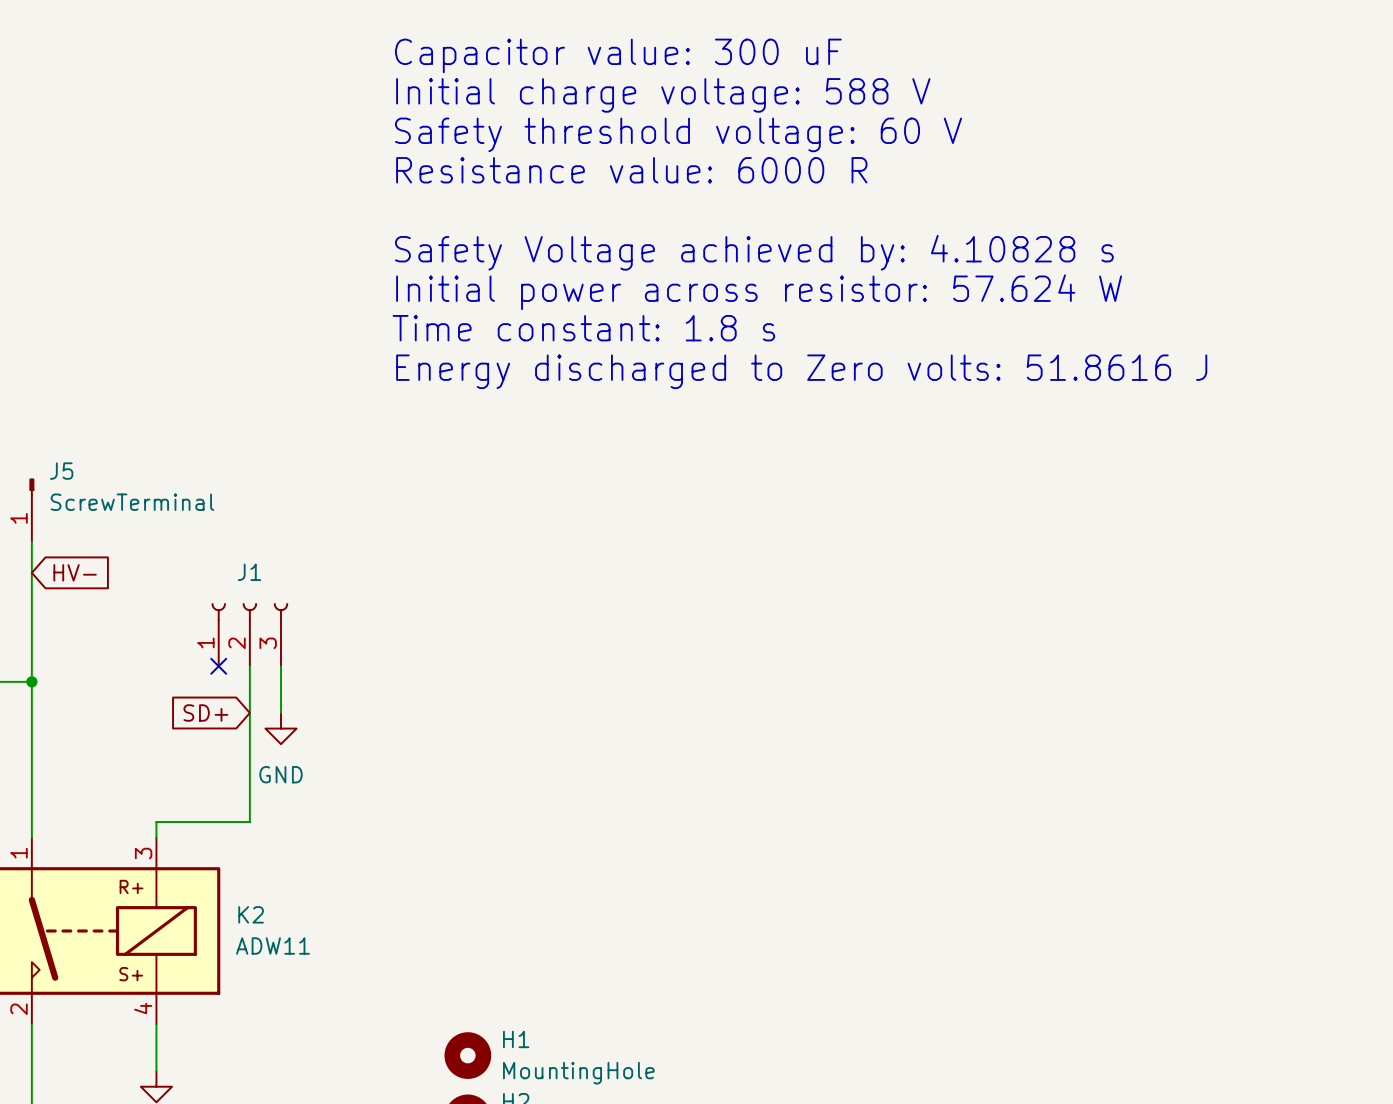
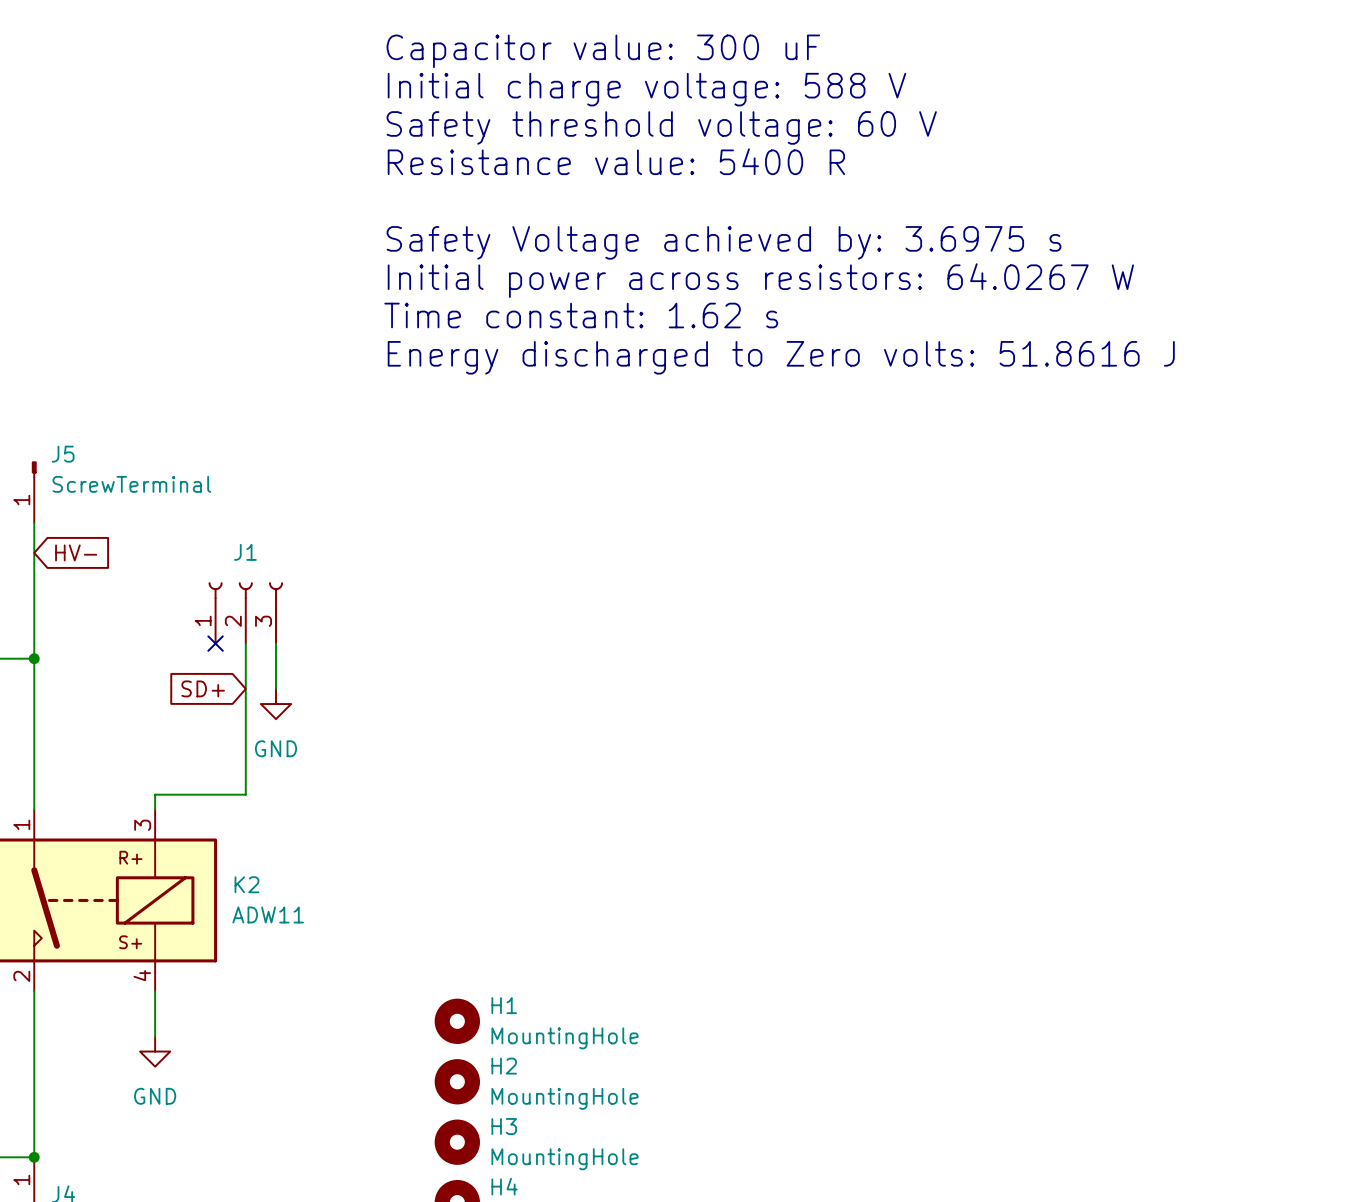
text: Resistance value: 6000 R (631, 170) -> Resistance value: 5400 R (616, 161)
text: Safety Voltage achieved by: 4.10828 s (754, 252) -> Safety Voltage achieved by: 3.6975 s (724, 242)
text: Initial power across resistor: 57.624 W (759, 292) -> Initial power across resistors: 64.0267 W (760, 280)
text: Time constant: 1.8 s (583, 328) -> Time constant: 1.62 s (581, 315)

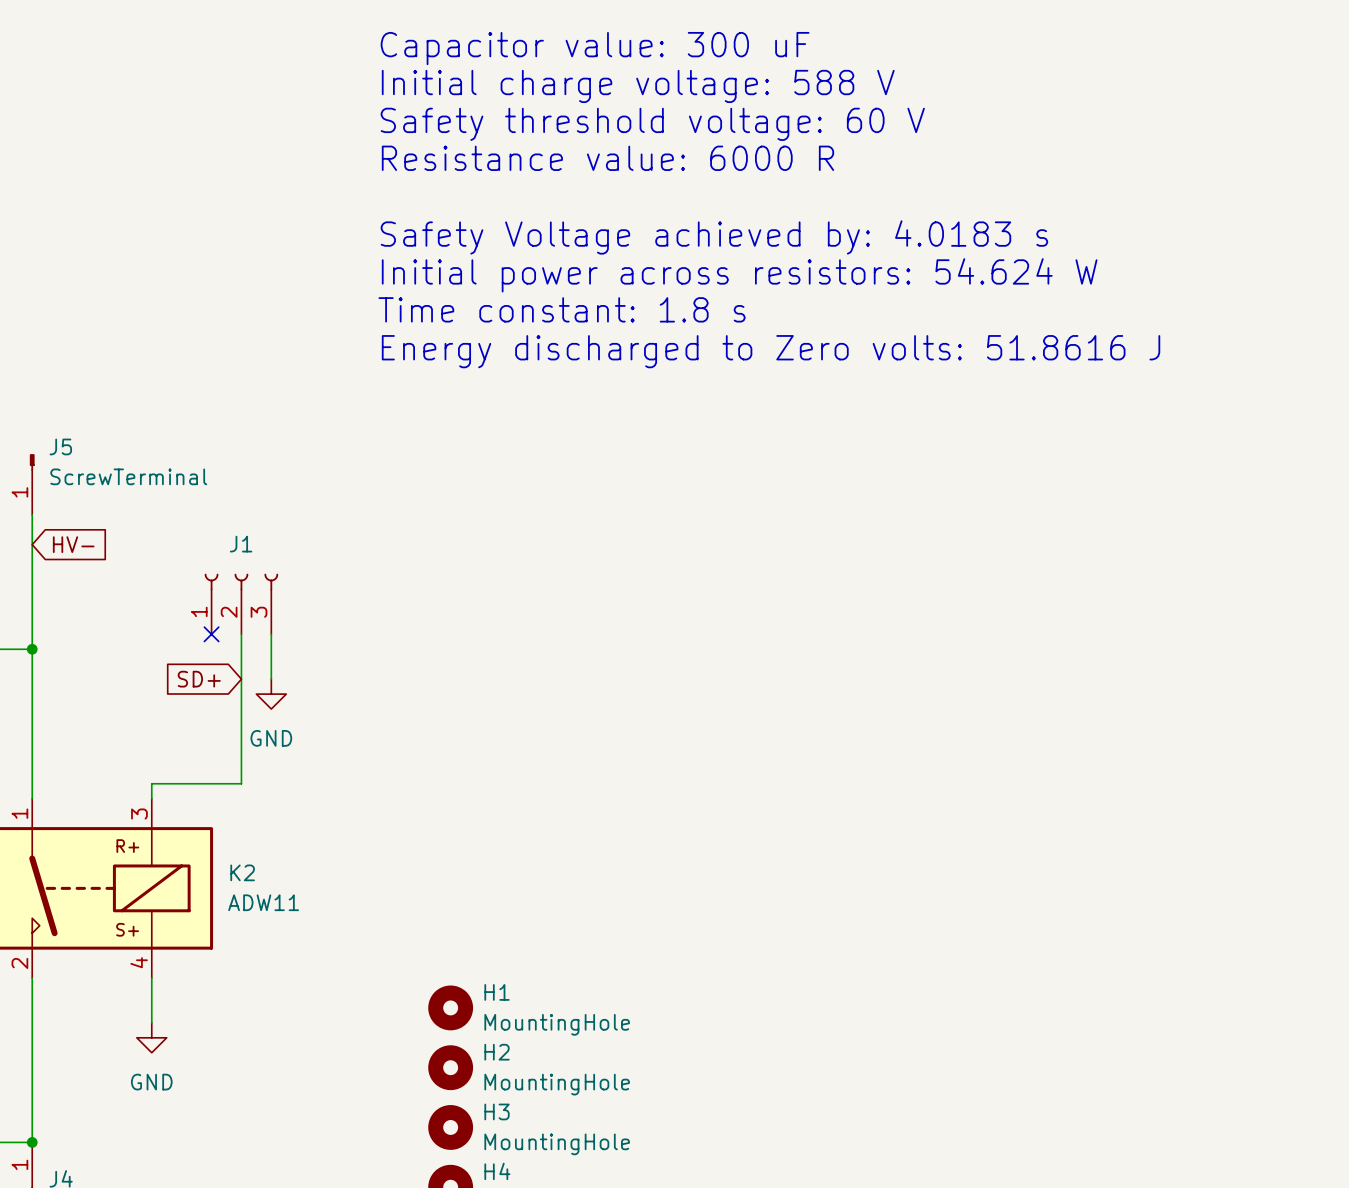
text: Resistance value: 5400 R (616, 161) -> Resistance value: 6000 R (607, 158)
text: Safety Voltage achieved by: 3.6975 s (724, 242) -> Safety Voltage achieved by: 4.0183 s (714, 237)
text: Initial power across resistors: 64.0267 W (760, 280) -> Initial power across resistors: 54.624 W (739, 275)
text: Time constant: 1.62 s (581, 315) -> Time constant: 1.8 s (562, 309)

